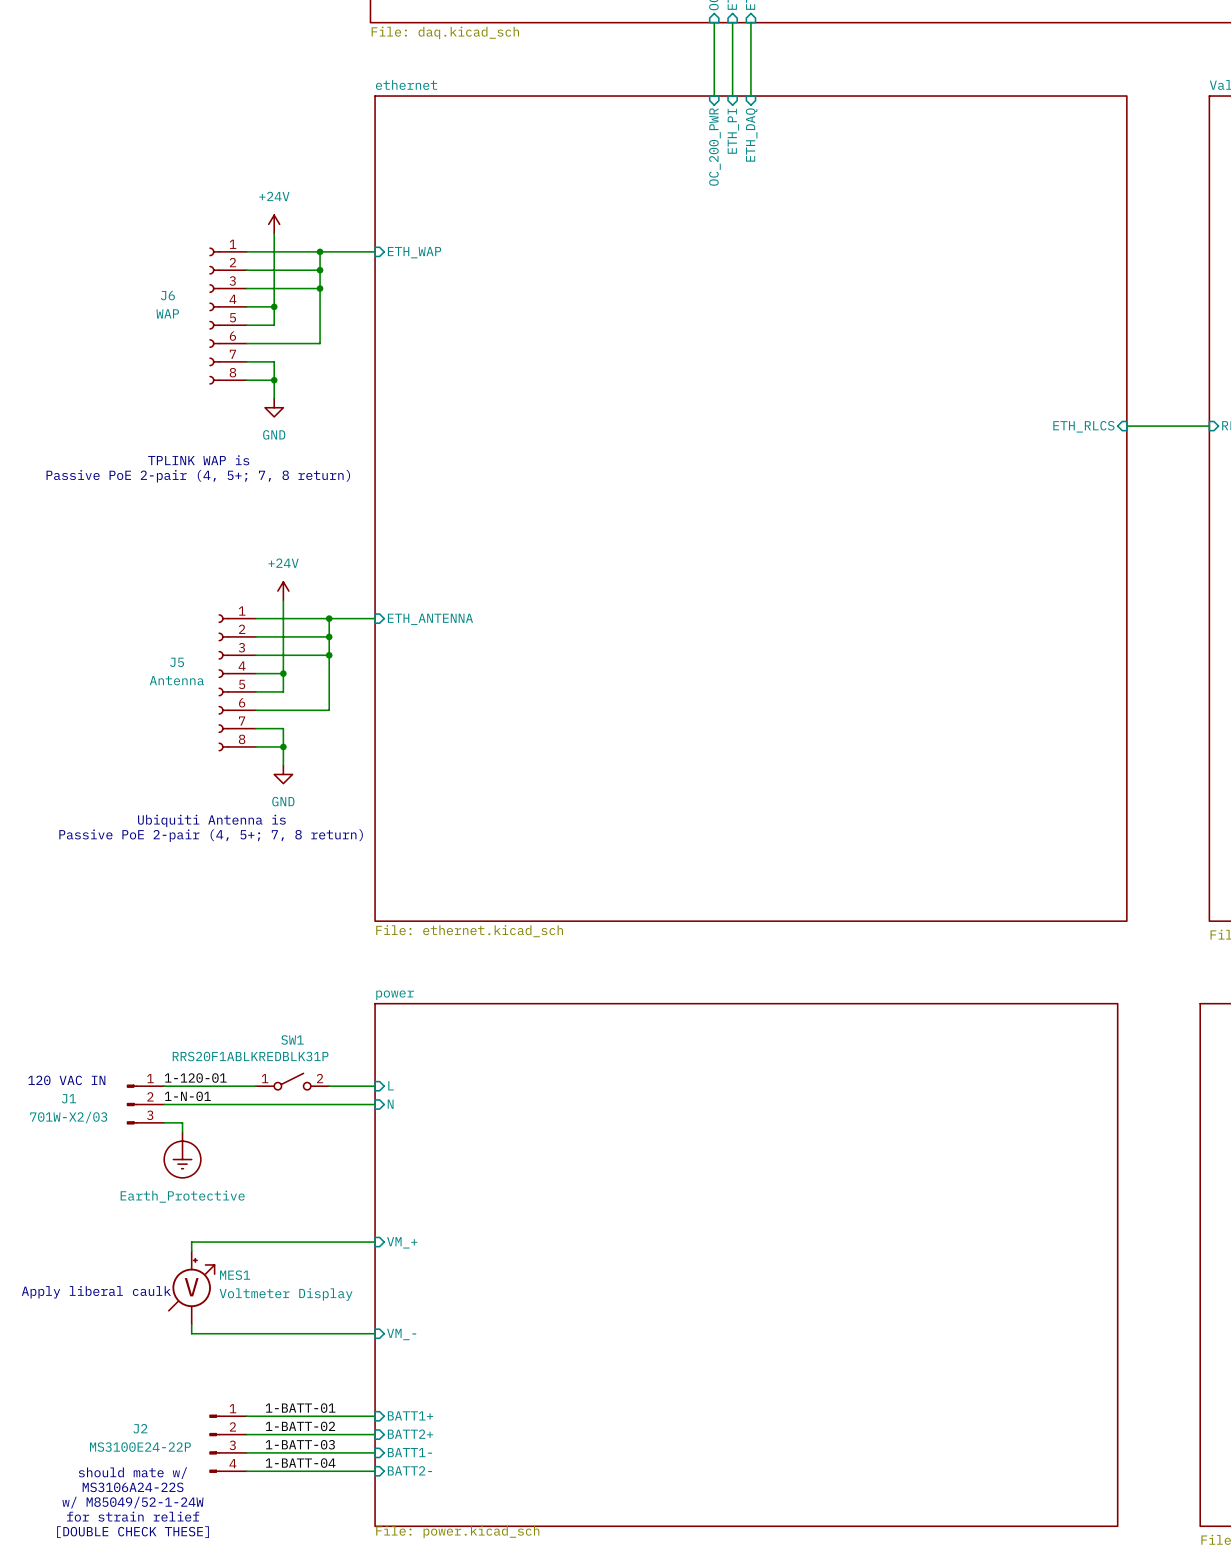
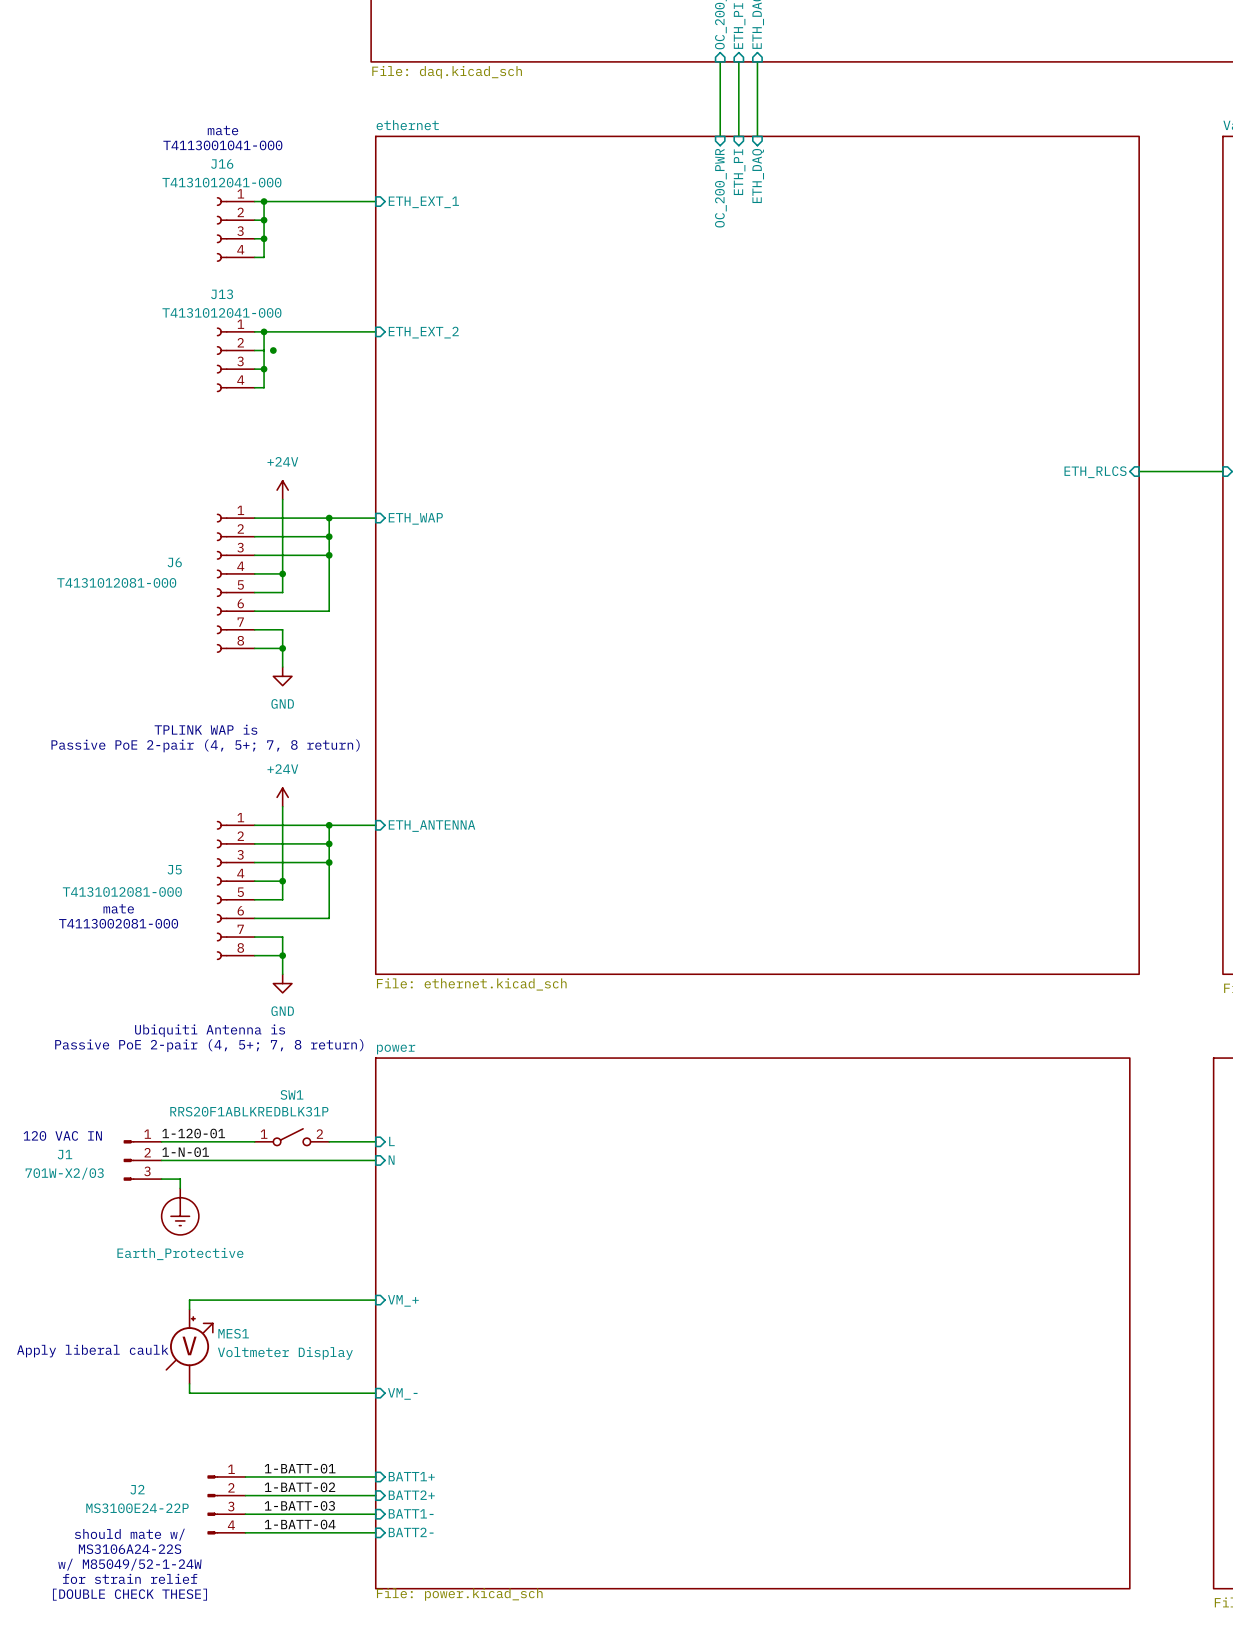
text: none -> mate (222, 130)
text: none -> T4113001041-000 (222, 145)
wire: none -> (254, 201) (375, 201)
wire: none -> (264, 201) (264, 257) (254, 257)
junction: none -> (264, 201)
sheet pin: none -> ETH_EXT_1 (423, 202)
junction: none -> (264, 220)
J16: none -> T4131012041-000 (235, 229)
junction: none -> (264, 238)
power symbol: +24V (274, 224) -> none
wire: (274, 233) (274, 325) (265, 325) -> none
wire: (246, 251) (375, 251) -> none
wire: (320, 251) (320, 343) (265, 343) -> (264, 331) (264, 387)
junction: (320, 251) -> none
sheet pin: ETH_WAP (414, 252) -> none
wire: (246, 270) (320, 270) -> none
junction: (320, 270) -> none
junction: none -> (264, 331)
wire: none -> (319, 331) (375, 331)
junction: (320, 288) -> none
sheet pin: none -> ETH_EXT_2 (423, 332)
wire: (265, 306) (274, 306) -> none
J6 value: WAP (167, 313) -> T4131012081-000 (116, 582)
J6 position: (228, 316) -> (235, 583)
J13: none -> T4131012041-000 (235, 359)
junction: none -> (264, 369)
wire: (246, 361) (274, 361) (274, 398) -> none
wire: (246, 380) (274, 380) -> (254, 573) (282, 573)
junction: (274, 380) -> none
power symbol: GND (274, 407) -> none
power symbol: none -> +24V (282, 490)
wire: none -> (282, 499) (282, 592) (254, 592)
text: TPLINK WAP is (198, 460) -> none
wire: none -> (254, 518) (375, 518)
wire: none -> (329, 518) (329, 611) (254, 611)
junction: none -> (329, 518)
sheet pin: none -> ETH_WAP (415, 518)
text: Passive PoE 2-pair (4, 5+; 7, 8 return) (198, 476) -> none
wire: none -> (254, 536) (329, 536)
junction: none -> (329, 536)
wire: none -> (254, 555) (329, 555)
junction: none -> (329, 555)
junction: none -> (282, 573)
wire: none -> (254, 629) (282, 629) (282, 648) (254, 648)
power symbol: +24V (283, 591) -> none
junction: none -> (282, 648)
wire: (255, 618) (375, 618) -> (254, 825) (375, 825)
wire: (283, 618) (283, 691) (255, 691) -> none
wire: (329, 618) (329, 710) (255, 710) -> (329, 825) (329, 918) (254, 918)
junction: (329, 618) -> none
sheet pin position: ETH_ANTENNA (430, 619) -> ETH_ANTENNA (431, 826)
power symbol: none -> GND (282, 676)
wire: (255, 636) (329, 636) -> (254, 843) (329, 843)
junction: (329, 636) -> none
wire: (255, 655) (329, 655) -> (254, 862) (329, 862)
junction: (329, 655) -> none
wire: (255, 673) (283, 673) -> (254, 881) (282, 881)
junction: (283, 673) -> none
J5 value: Antenna (176, 680) -> T4131012081-000 (122, 891)
text: none -> TPLINK WAP is (205, 729)
J5 position: (237, 682) -> (235, 890)
text: none -> Passive PoE 2-pair (4, 5+; 7, 8 return) (205, 745)
wire: (255, 728) (283, 728) (283, 756) -> none
wire: (255, 746) (283, 746) -> (254, 955) (282, 955)
junction: (283, 746) -> none
power symbol: none -> +24V (282, 797)
wire: none -> (282, 815) (282, 899) (254, 899)
power symbol: GND (283, 774) -> none
junction: none -> (329, 825)
junction: none -> (329, 843)
junction: none -> (329, 862)
text position: Ubiquiti Antenna is (211, 820) -> Ubiquiti Antenna is (210, 1030)
junction: none -> (282, 881)
text: Passive PoE 2-pair (4, 5+; 7, 8 return) (211, 835) -> none
text: none -> mate (118, 908)
text: none -> T4113002081-000 (118, 923)
wire: none -> (254, 937) (282, 937) (282, 974)
junction: none -> (282, 955)
power symbol: none -> GND (282, 983)
text: none -> Passive PoE 2-pair (4, 5+; 7, 8 return) (209, 1045)

